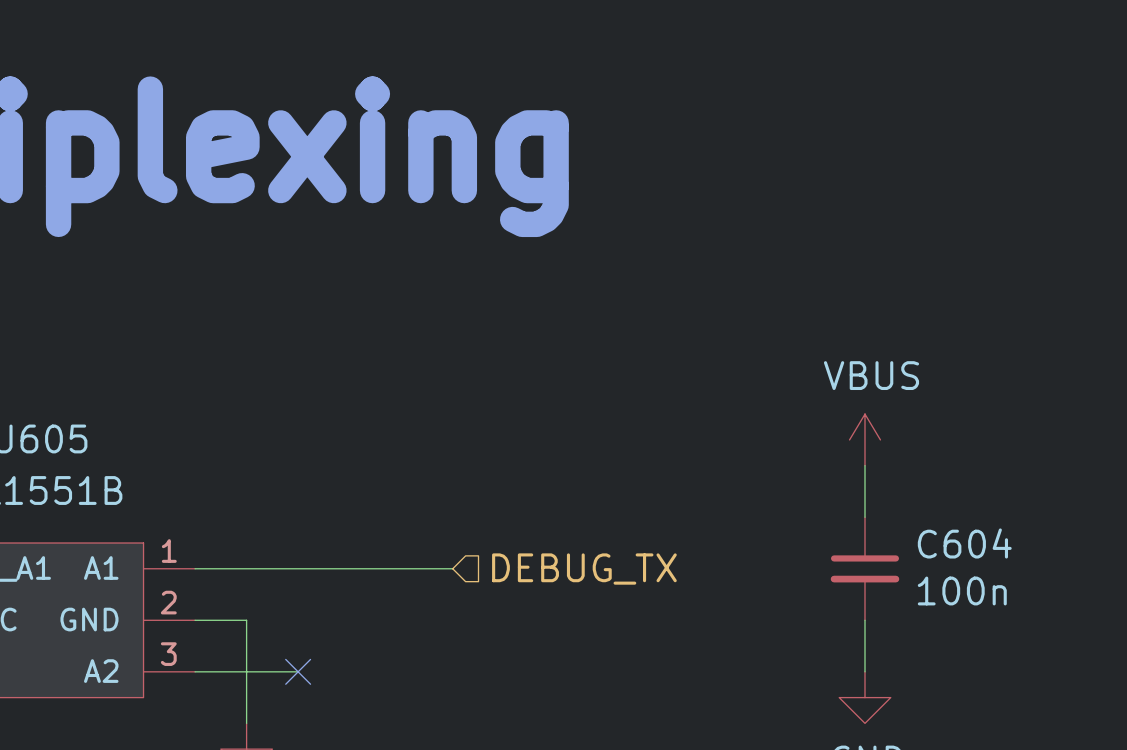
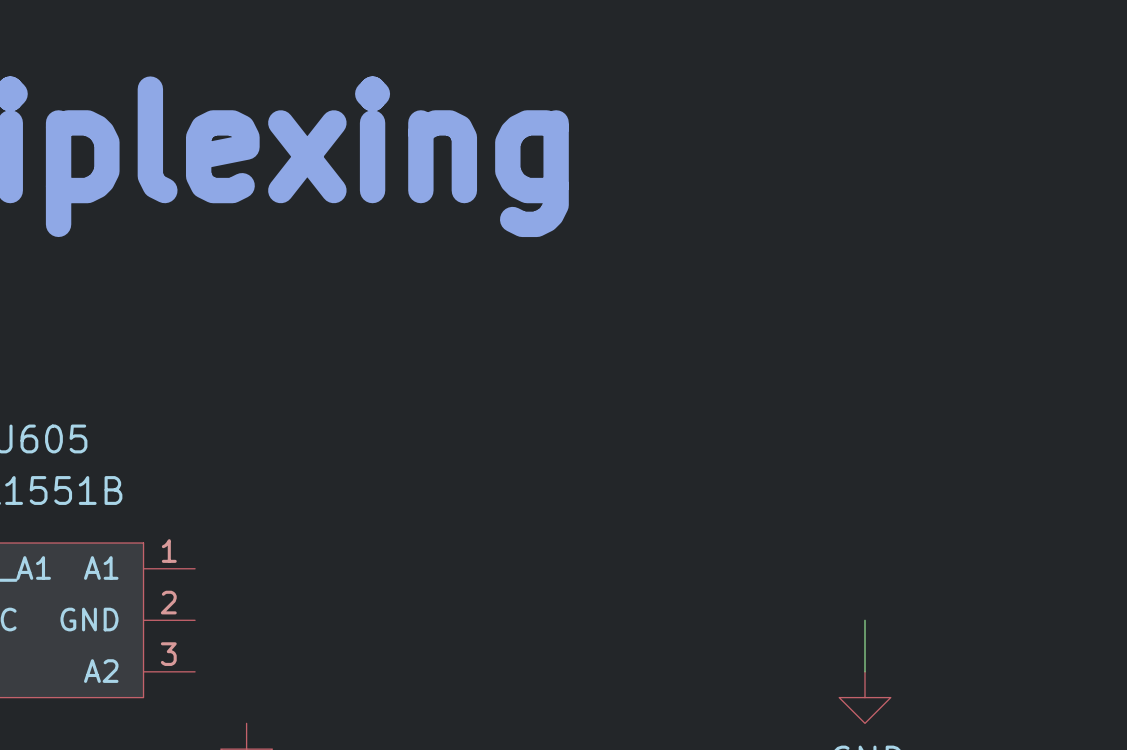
power symbol: VBUS (865, 439) -> none
wire: (865, 465) (865, 517) -> none
wire: (195, 568) (452, 568) -> none
C604: 100n (865, 568) -> none
hierarchical label: DEBUG_TX (584, 569) -> none
wire: (195, 620) (246, 620) (246, 723) -> none
wire: (195, 671) (298, 671) -> none
no-connect mark: (298, 671) -> none

